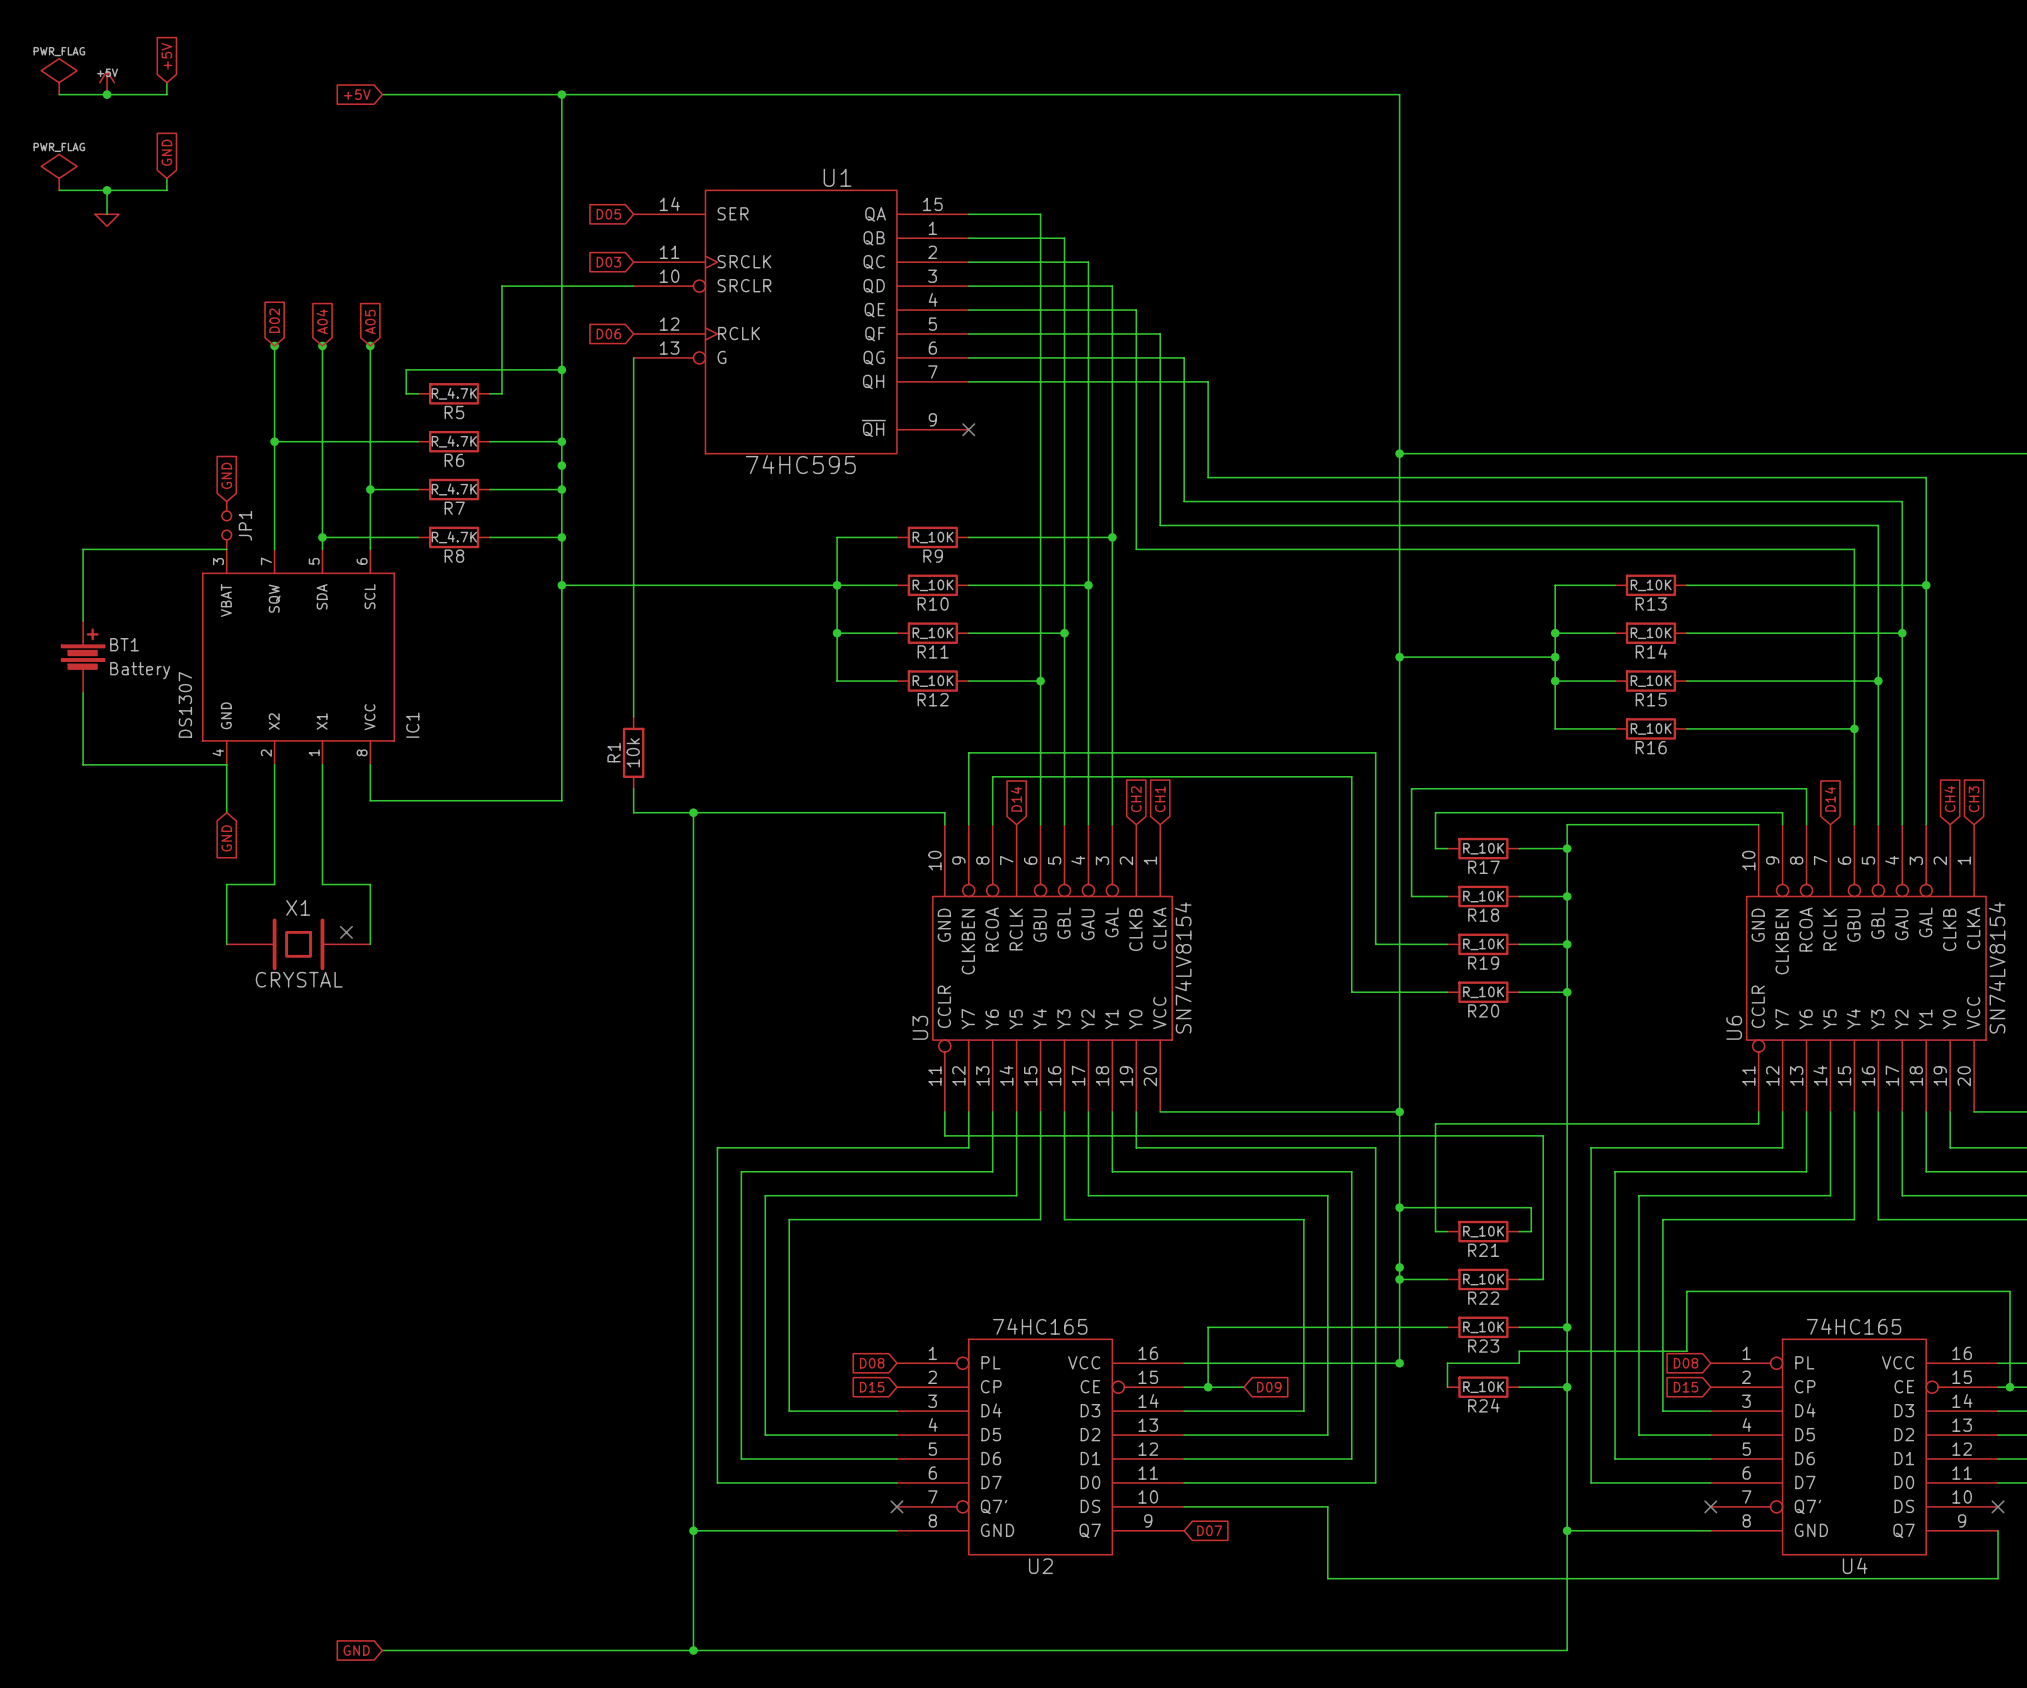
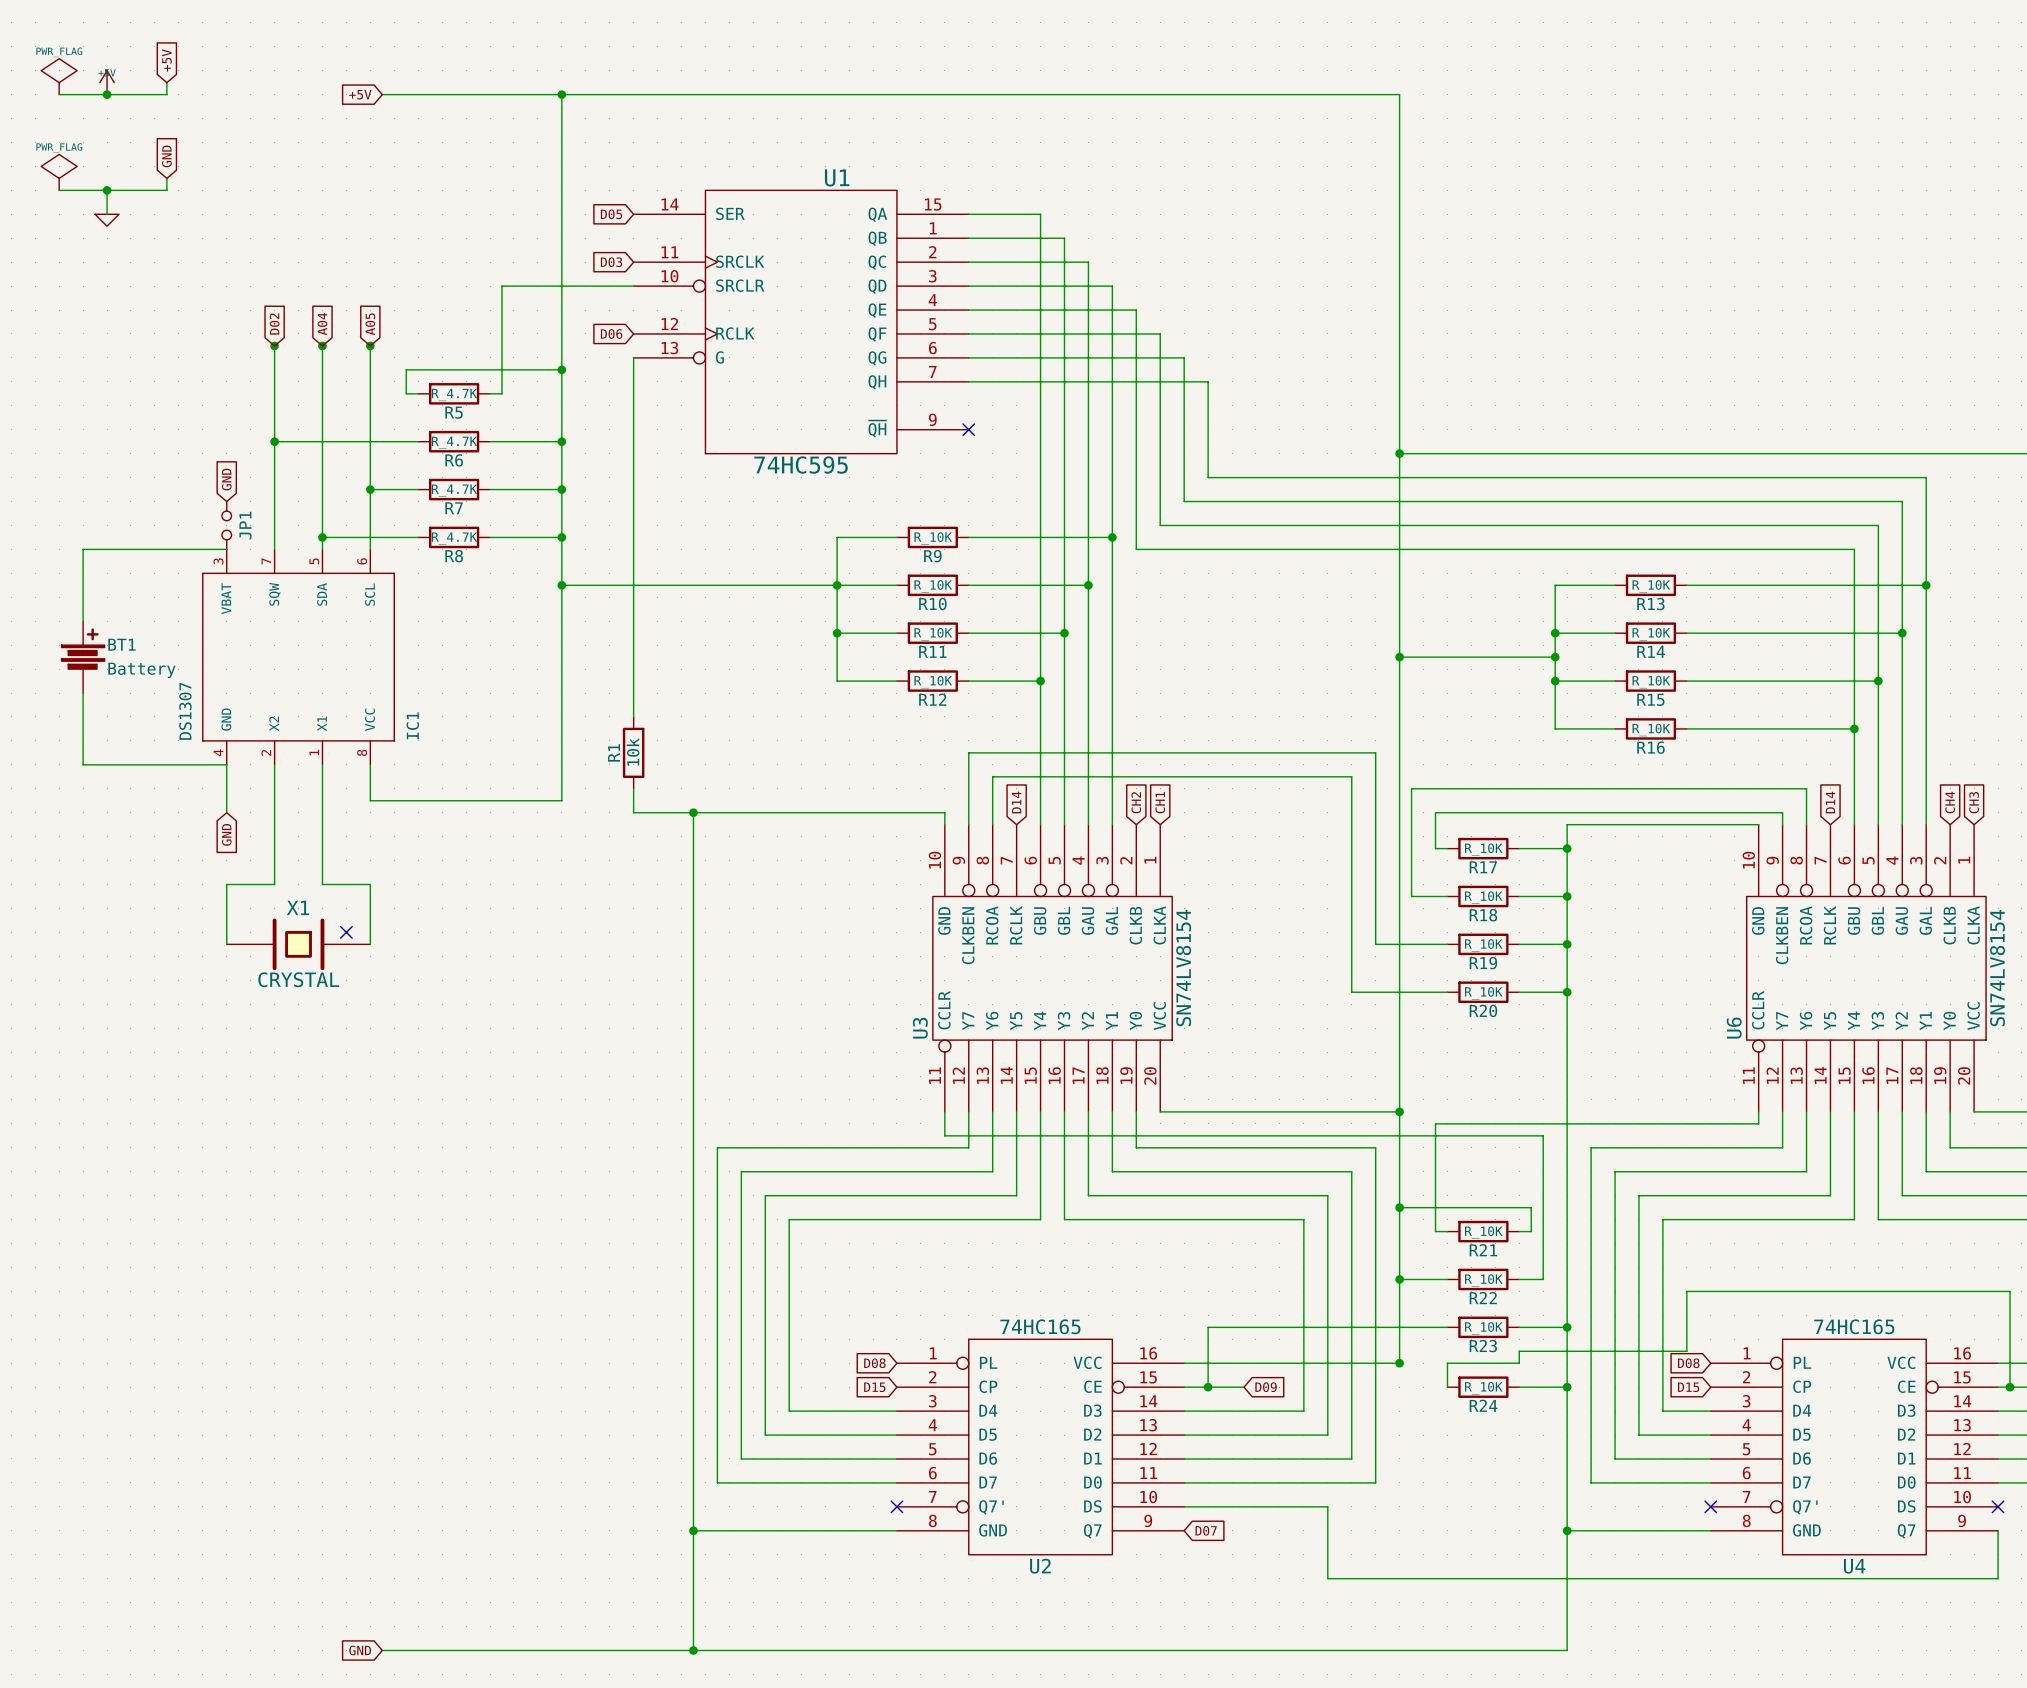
junction: (561, 465) -> none
junction: (1399, 1267) -> none

